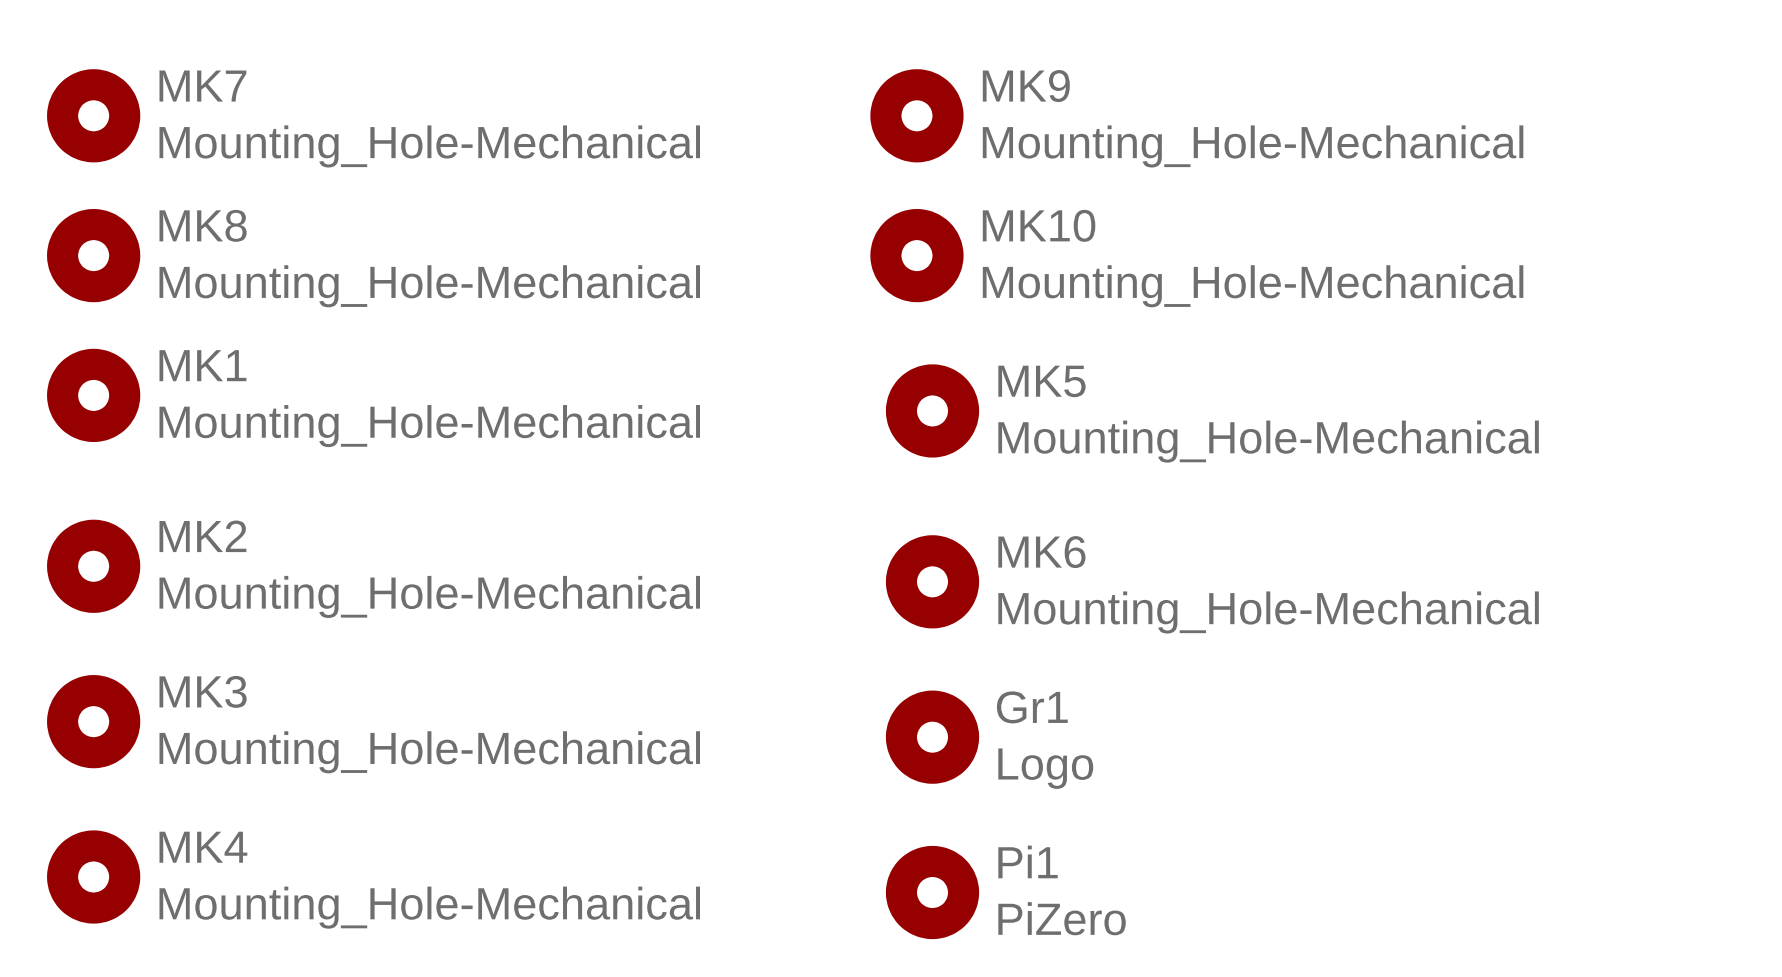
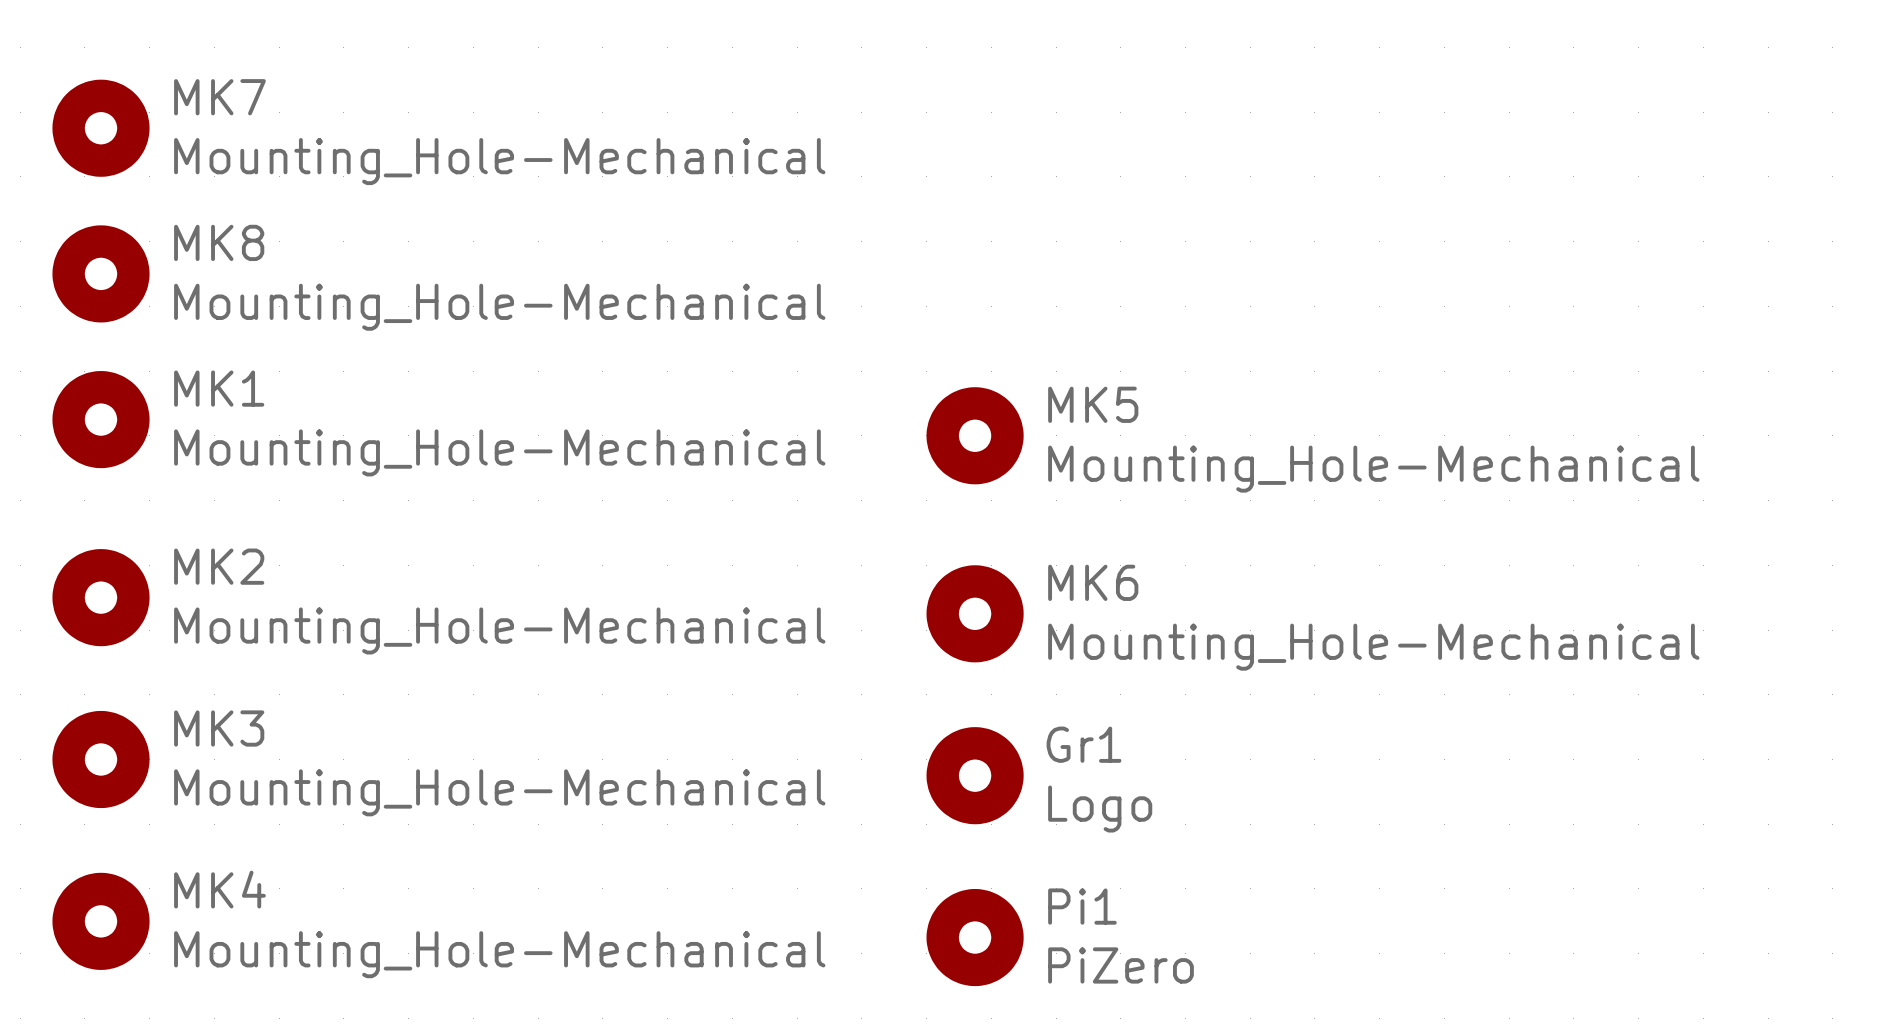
MK9: Mounting_Hole-Mechanical (916, 115) -> none
MK10: Mounting_Hole-Mechanical (916, 255) -> none

